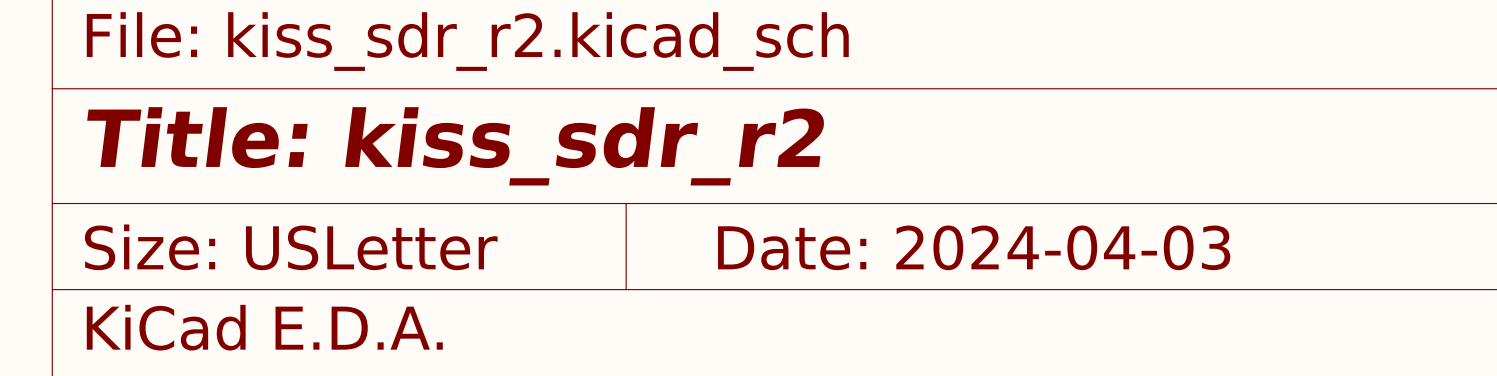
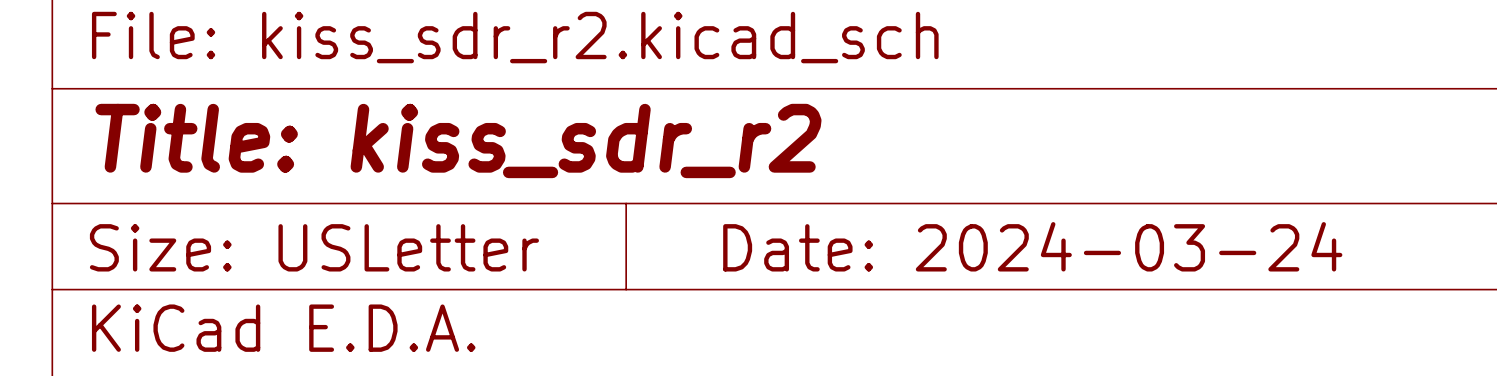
title block: Date: 2024-04-03 (974, 247) -> Date: 2024-03-24 (1032, 246)

